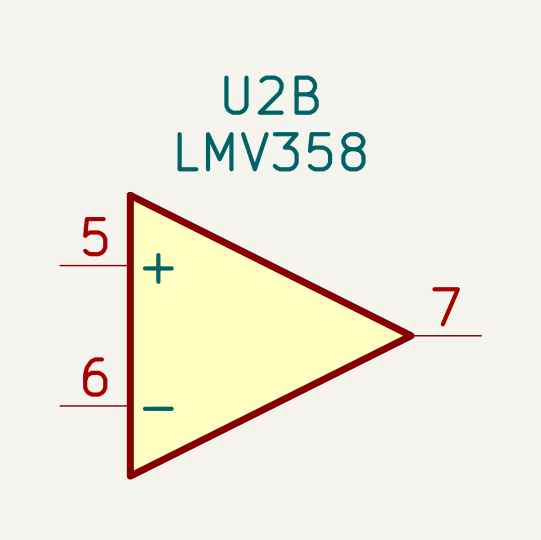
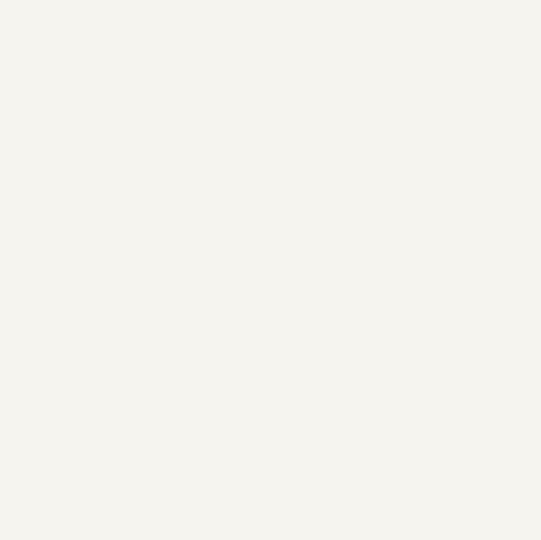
U2B: LMV358 (270, 335) -> none

